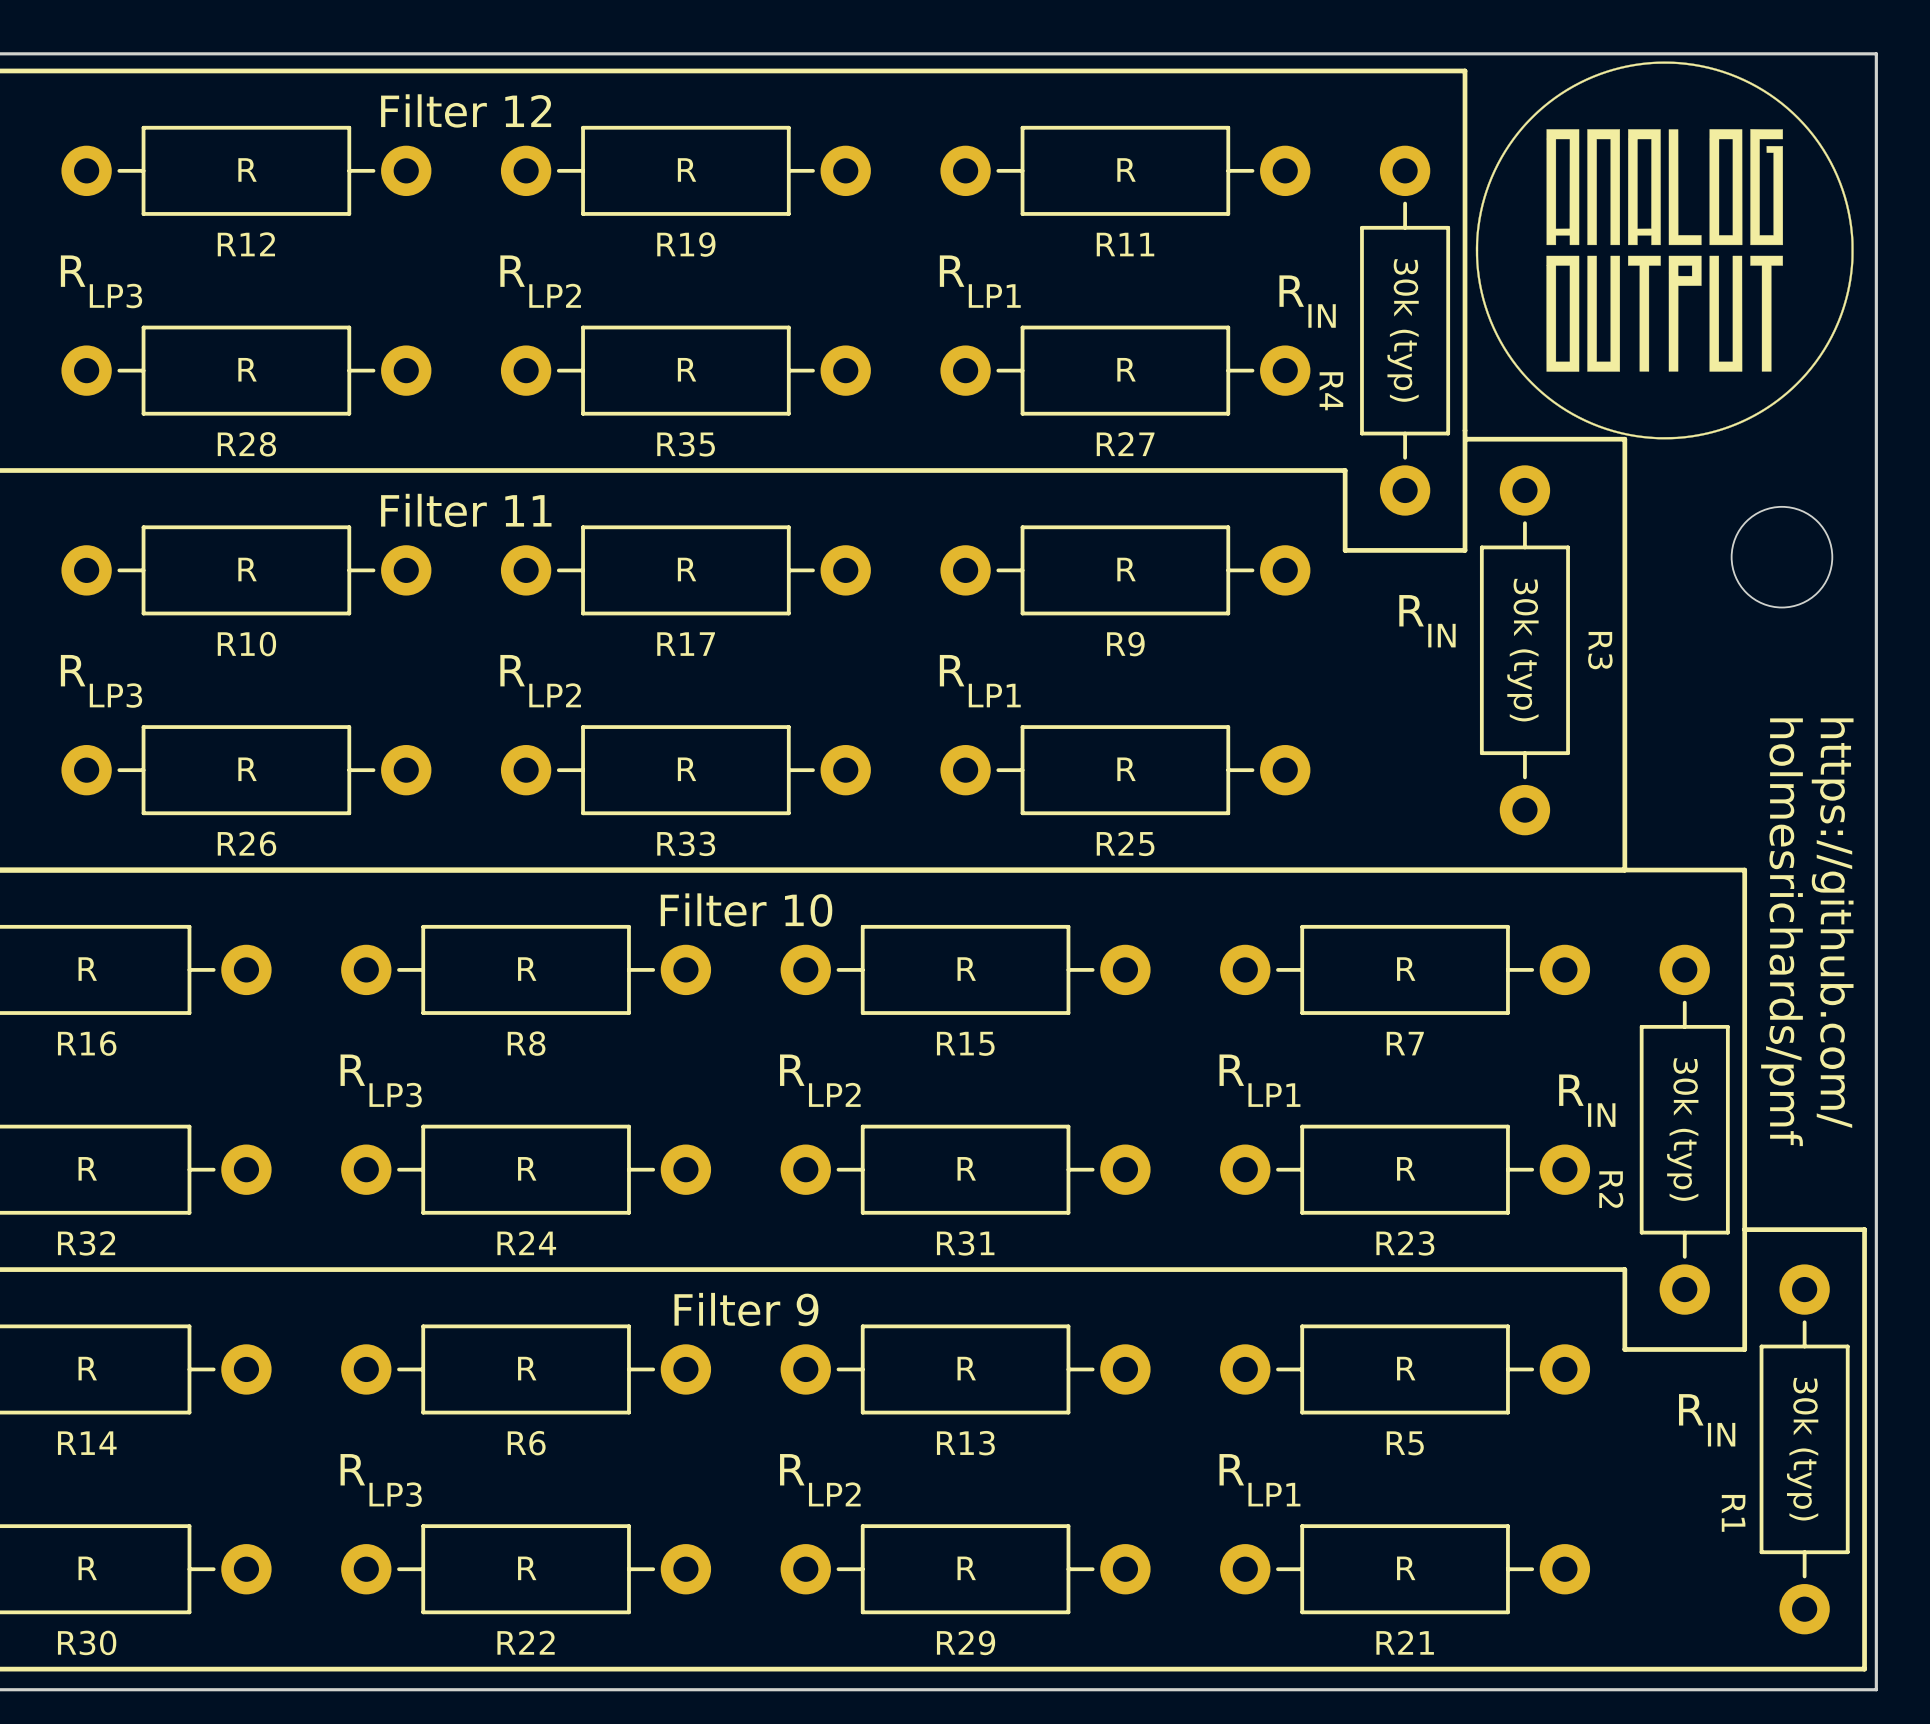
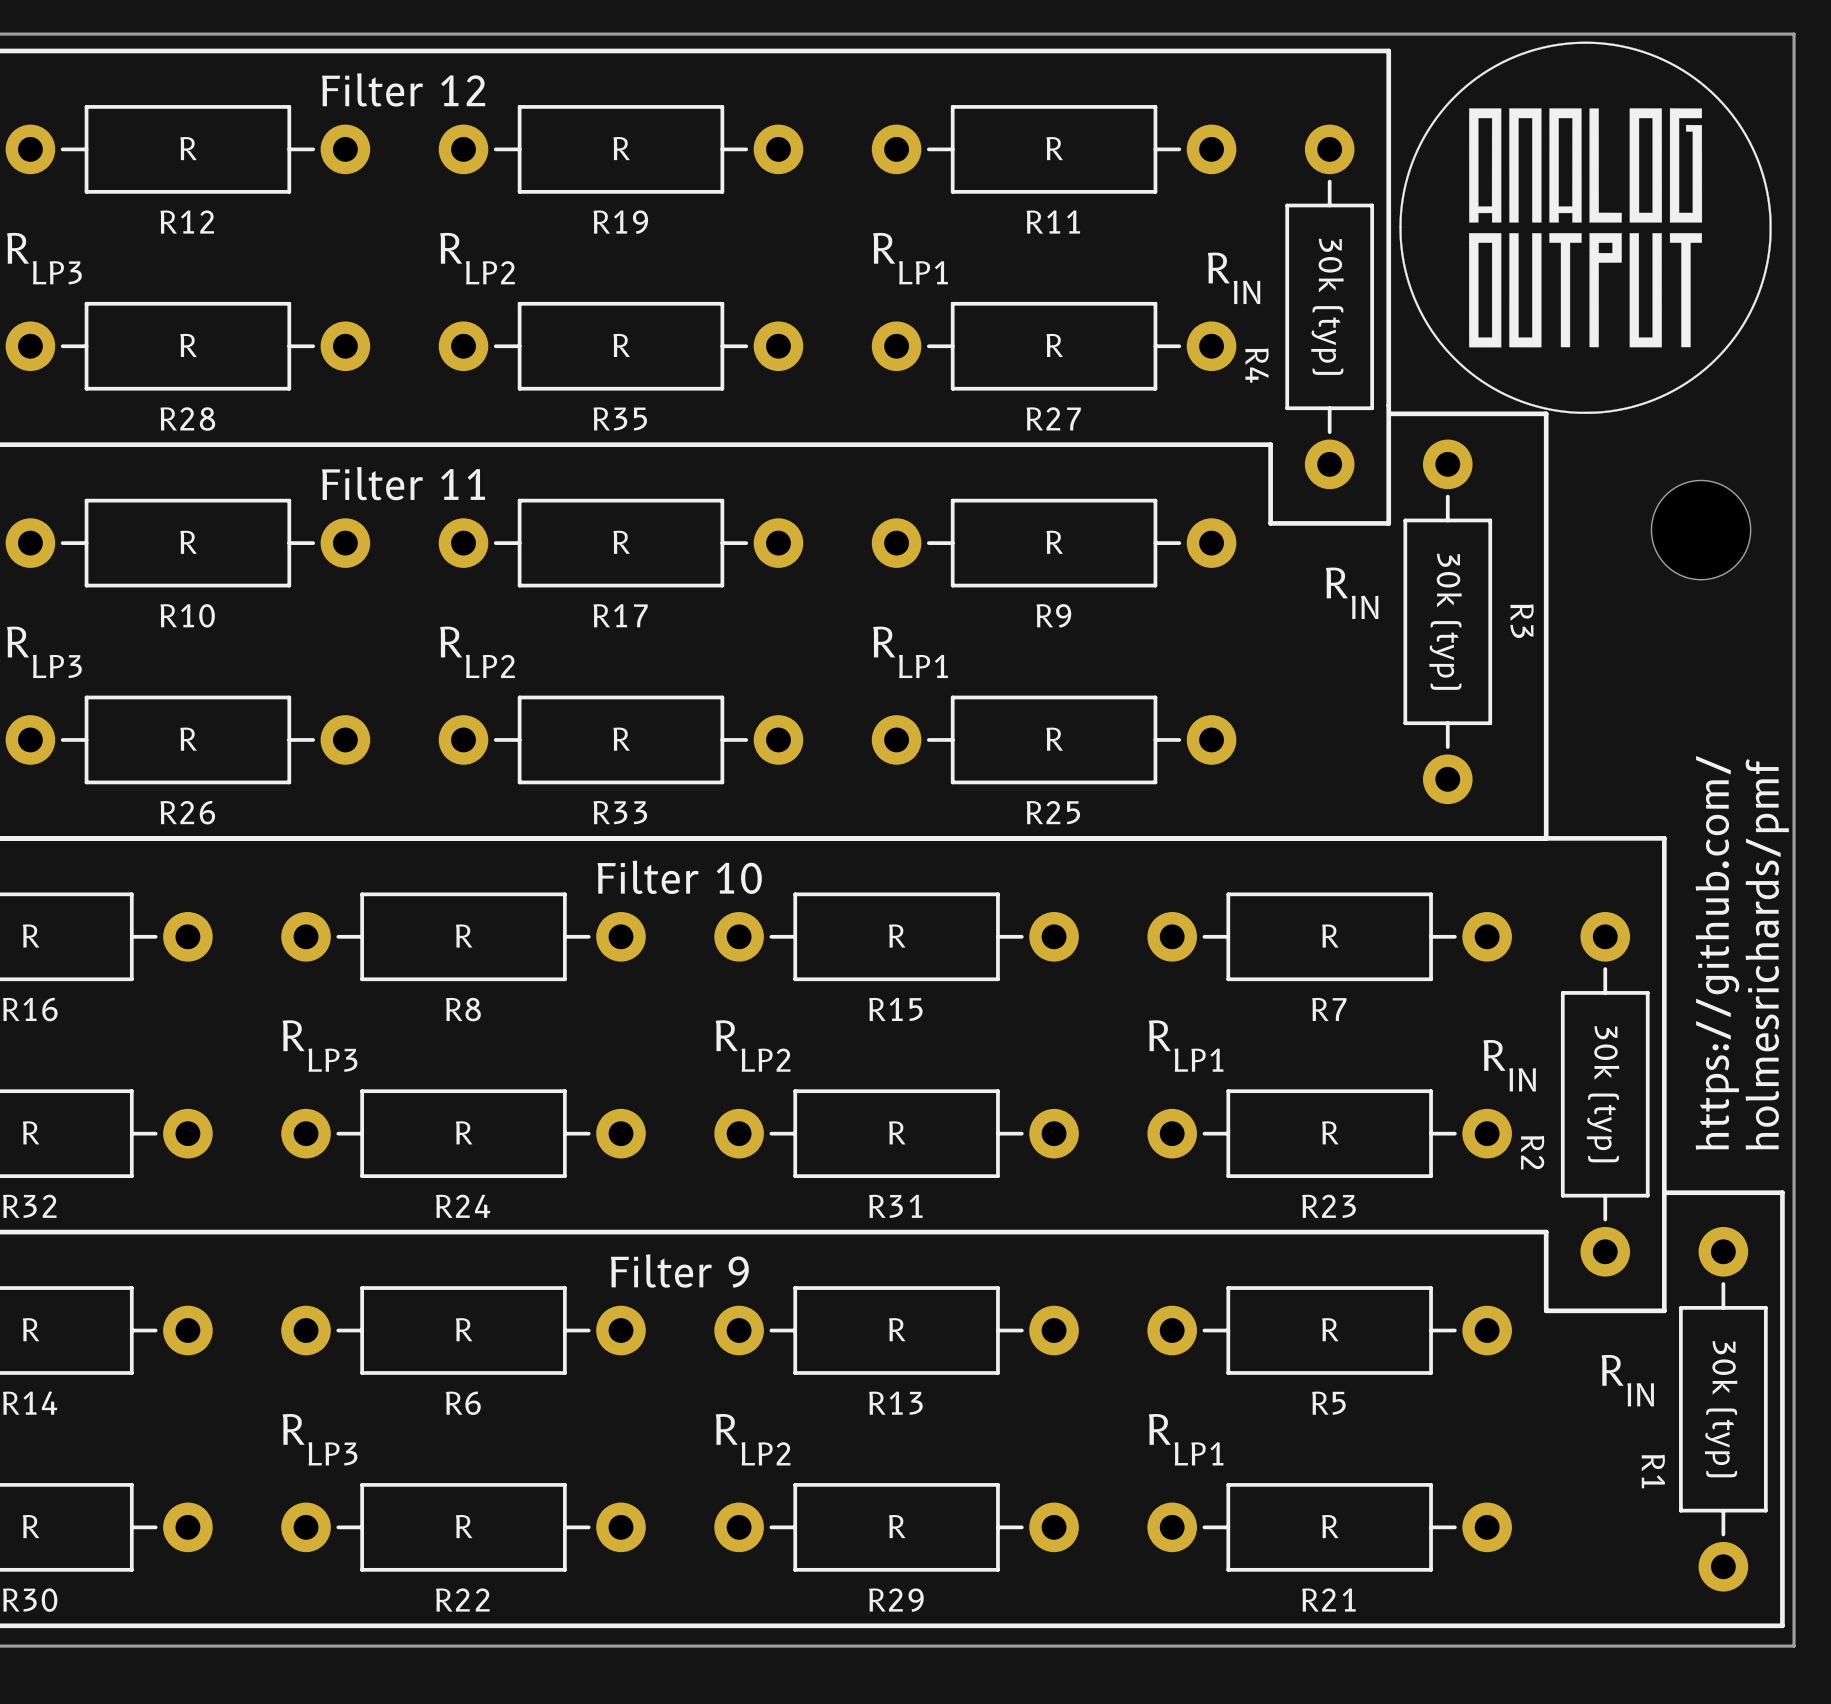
text rotation: 0° (1832, 923) -> 180° (1717, 952)
text rotation: 0° (1782, 932) -> 180° (1767, 954)

